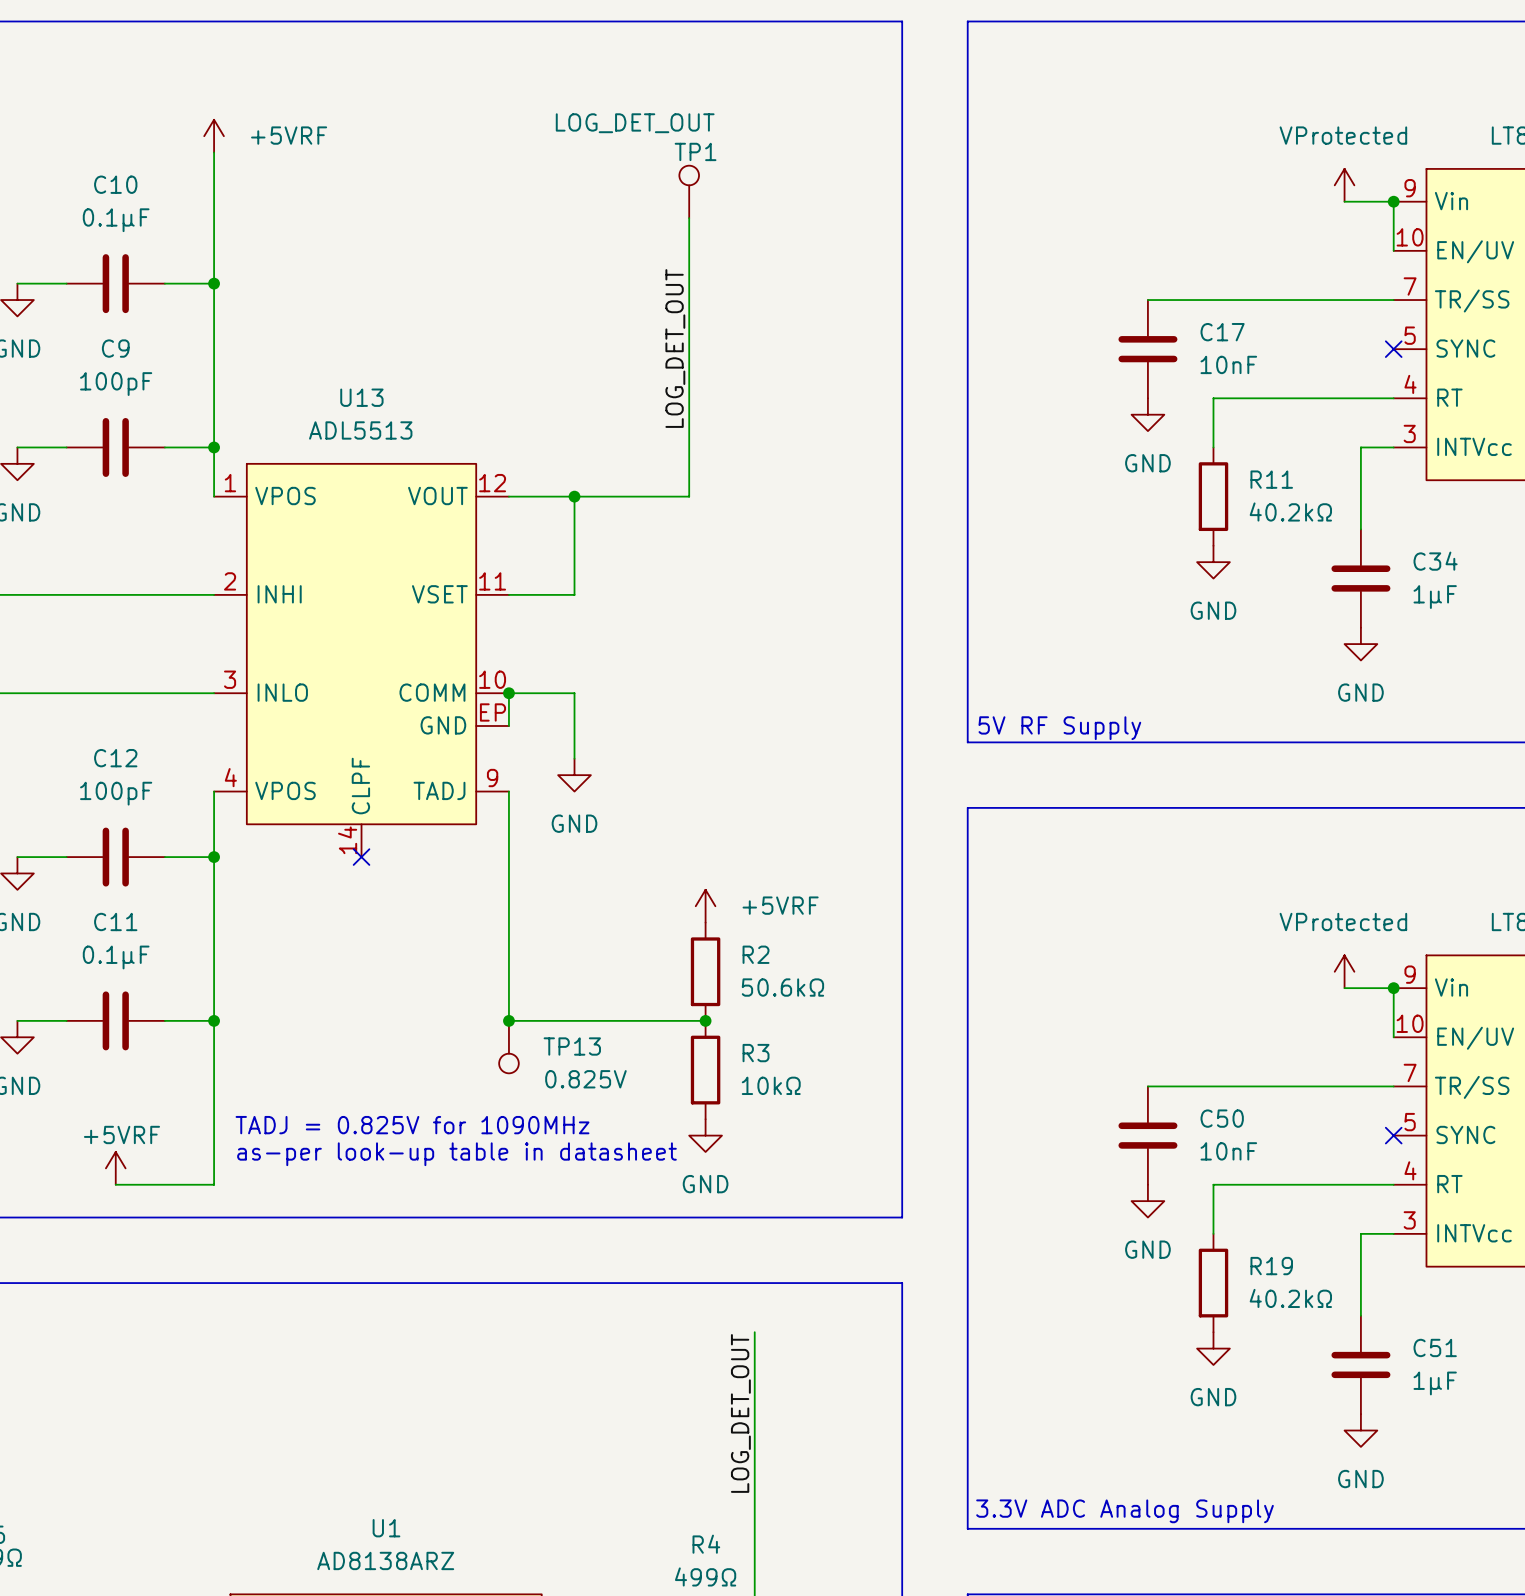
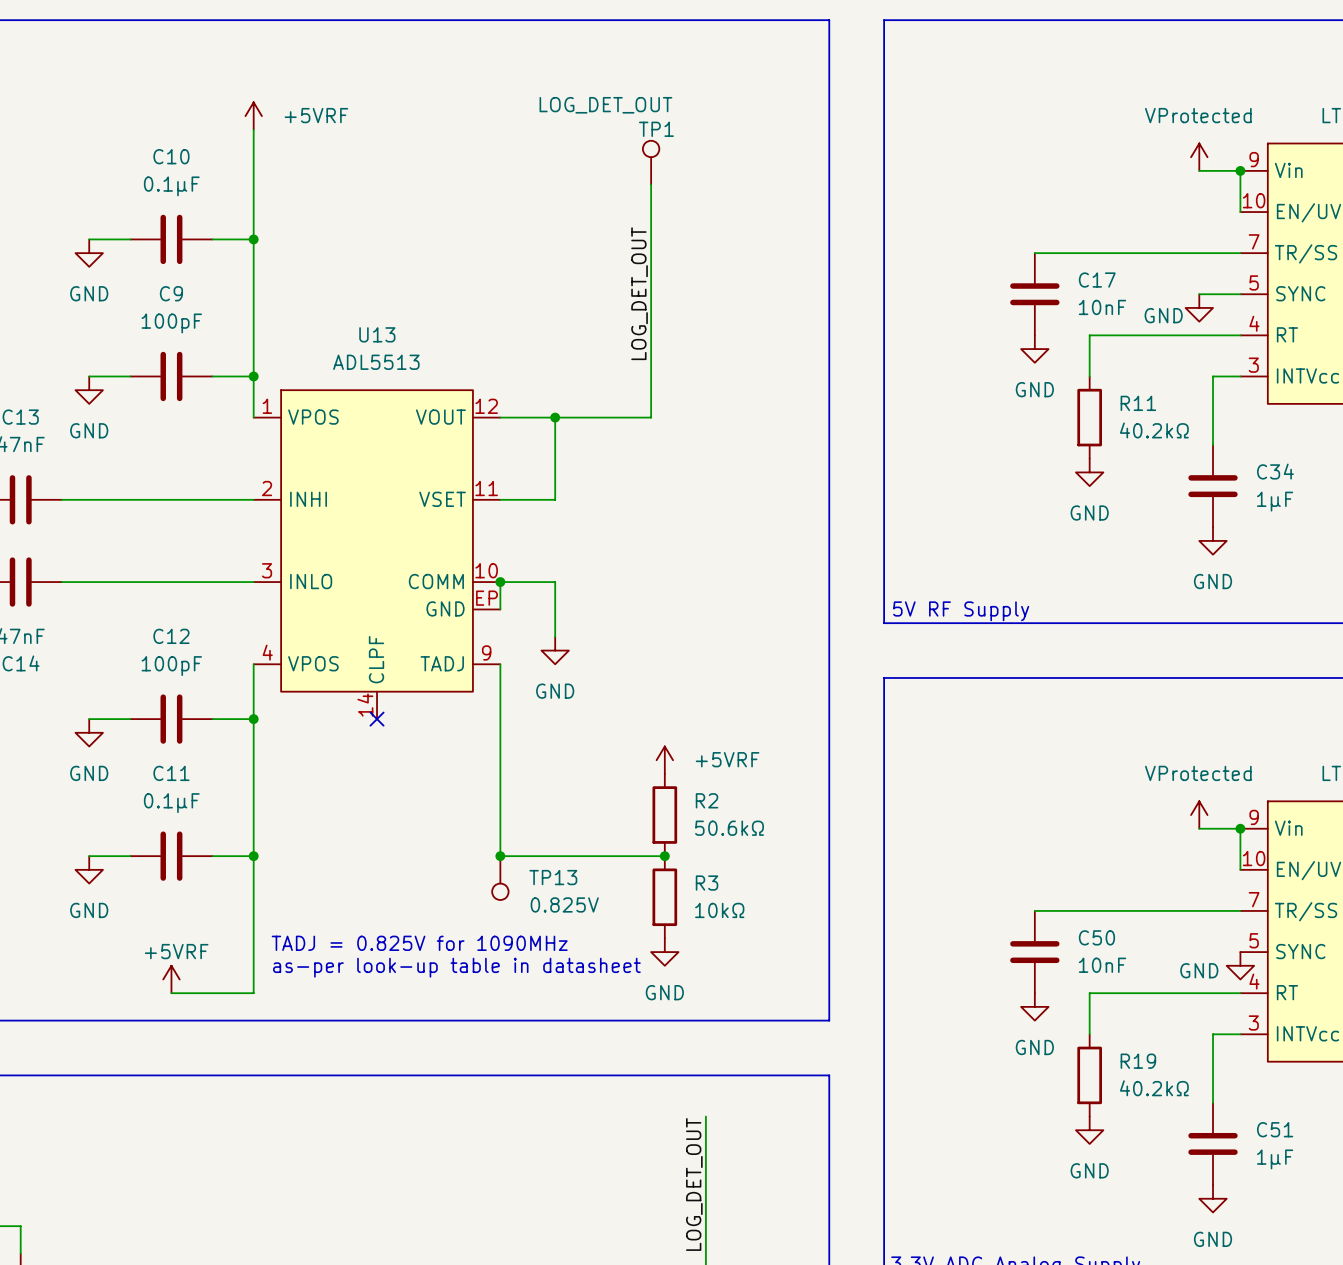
wire: none -> (1199, 294) (1240, 294)
no-connect mark: (1393, 349) -> none
power symbol: none -> GND (1199, 307)
no-connect mark: (1393, 1135) -> none
power symbol: none -> GND (1240, 965)

